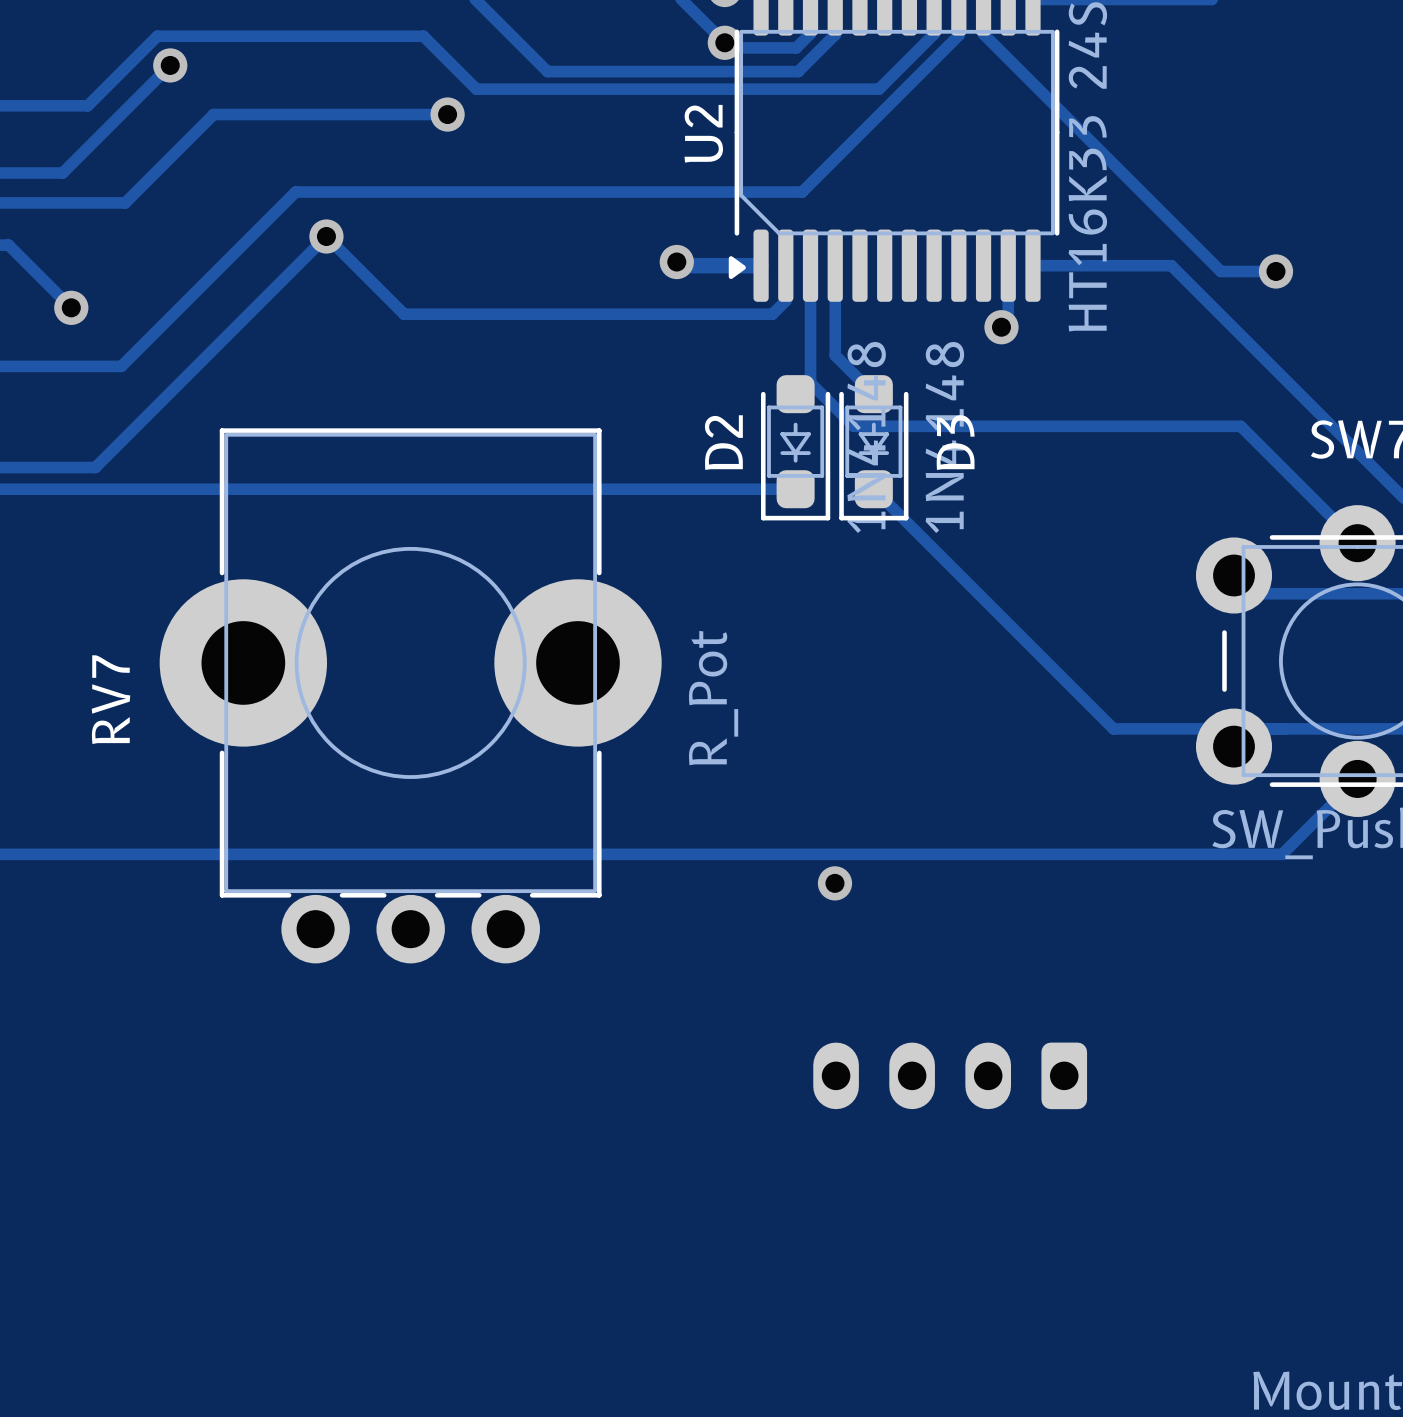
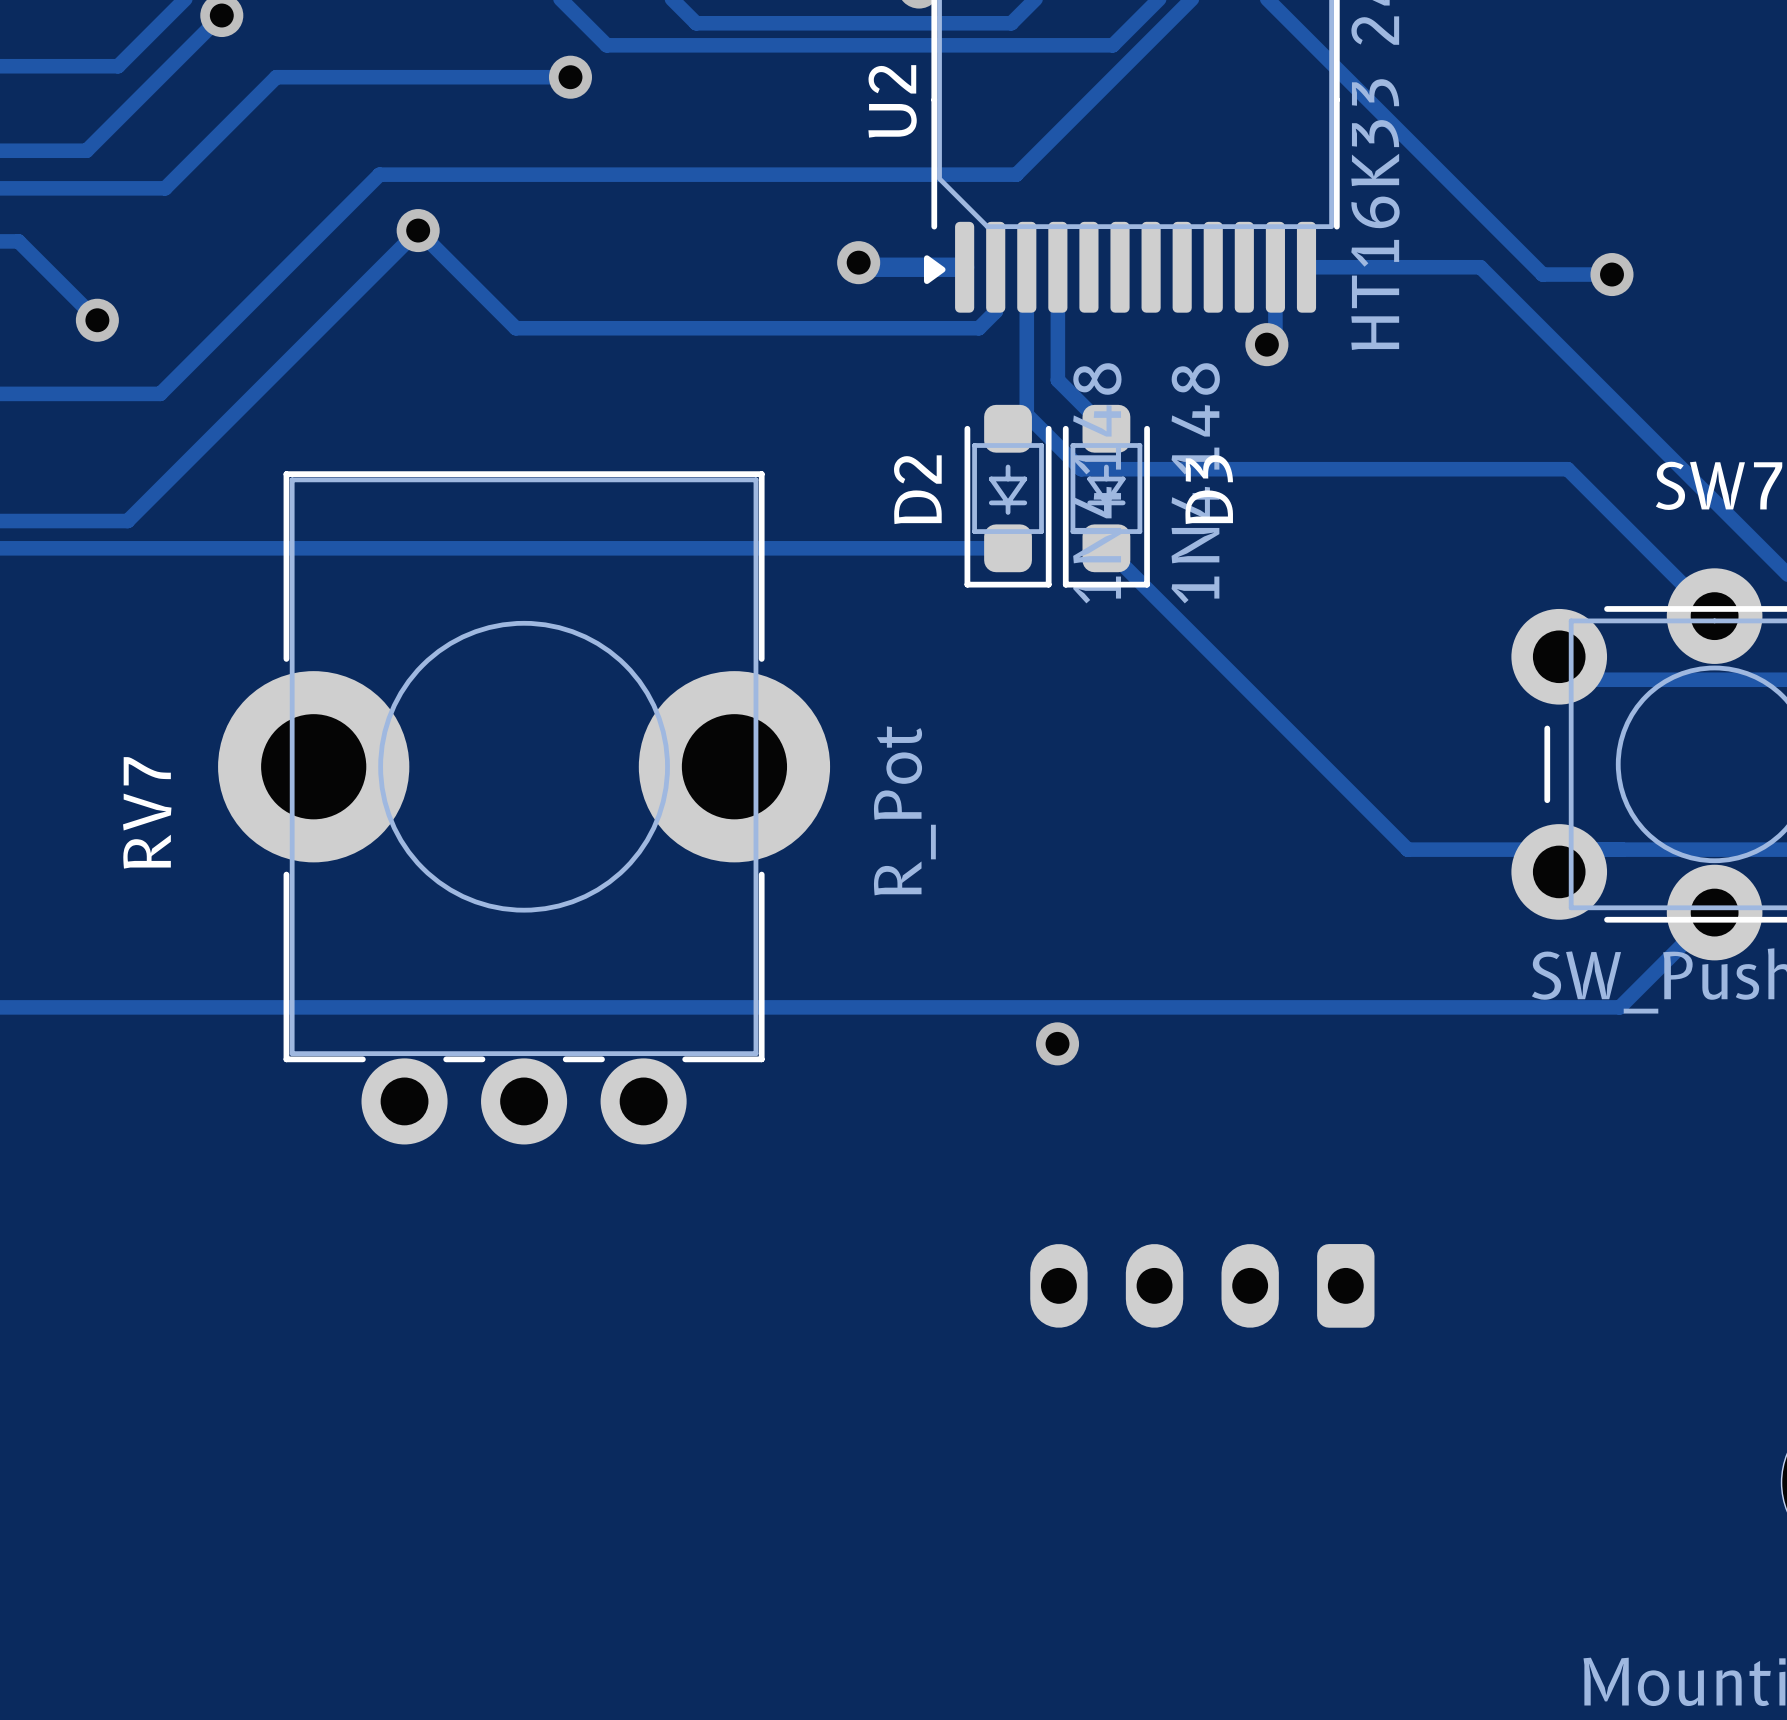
RV7 footprint: [159, 428, 662, 964] -> [218, 471, 831, 1145]

